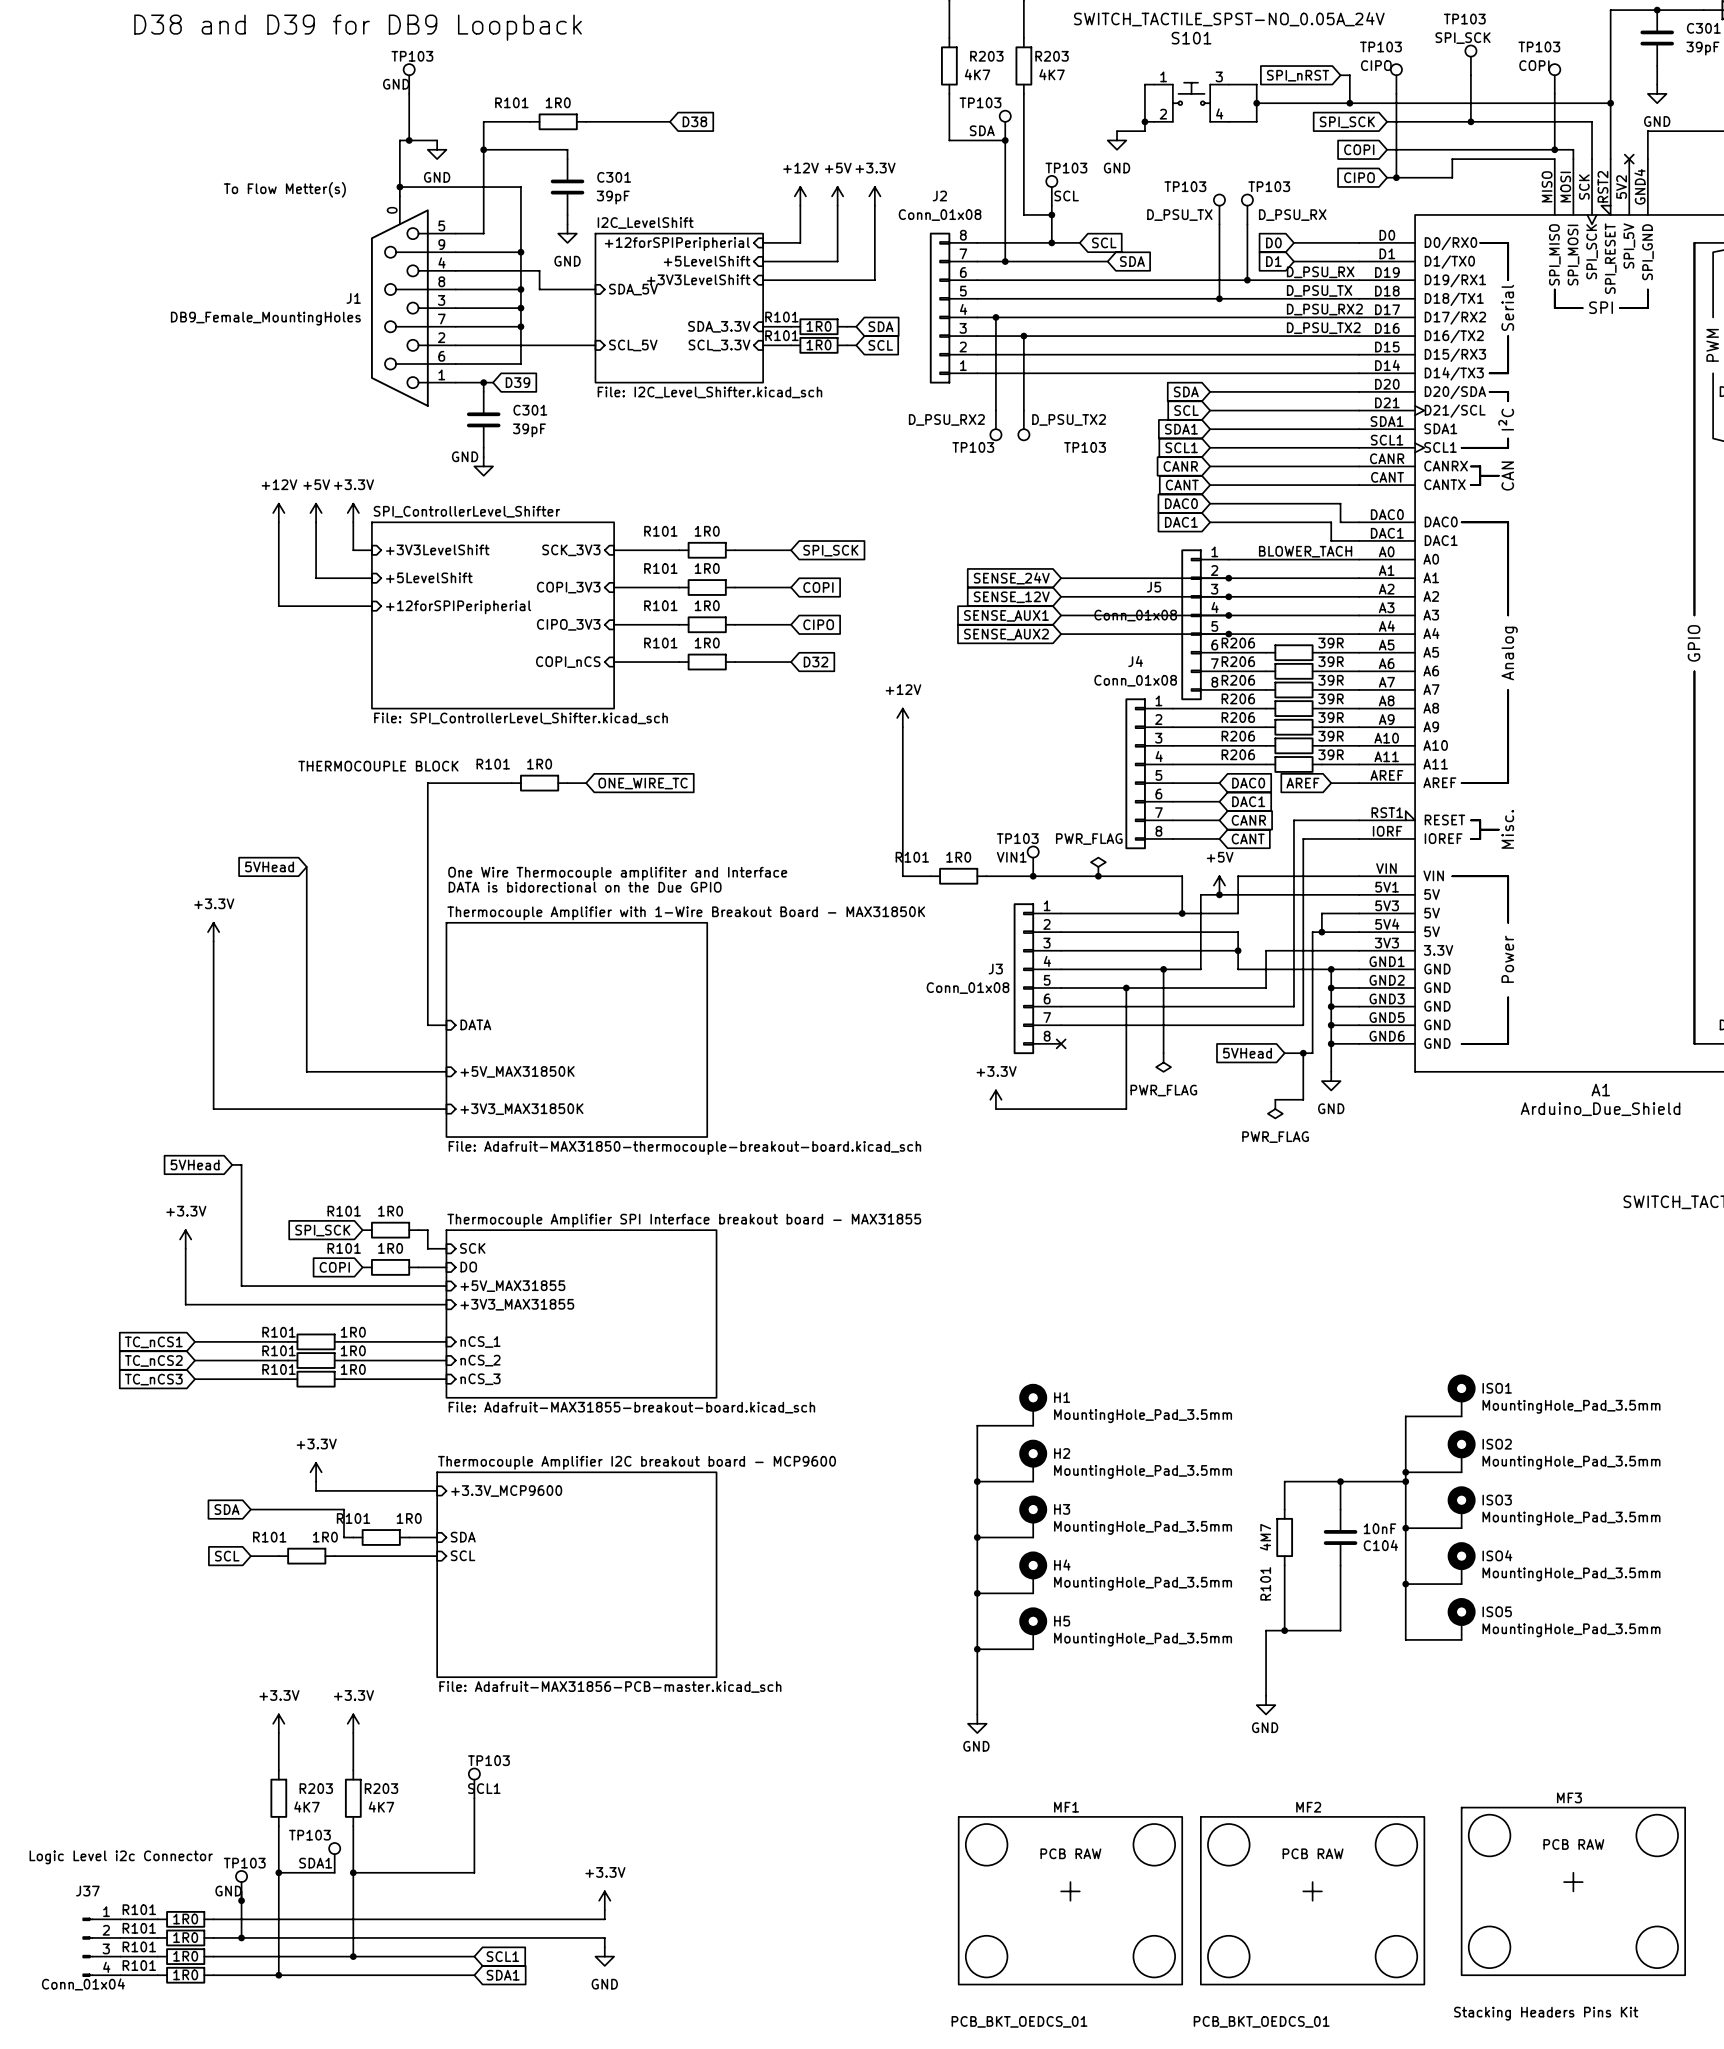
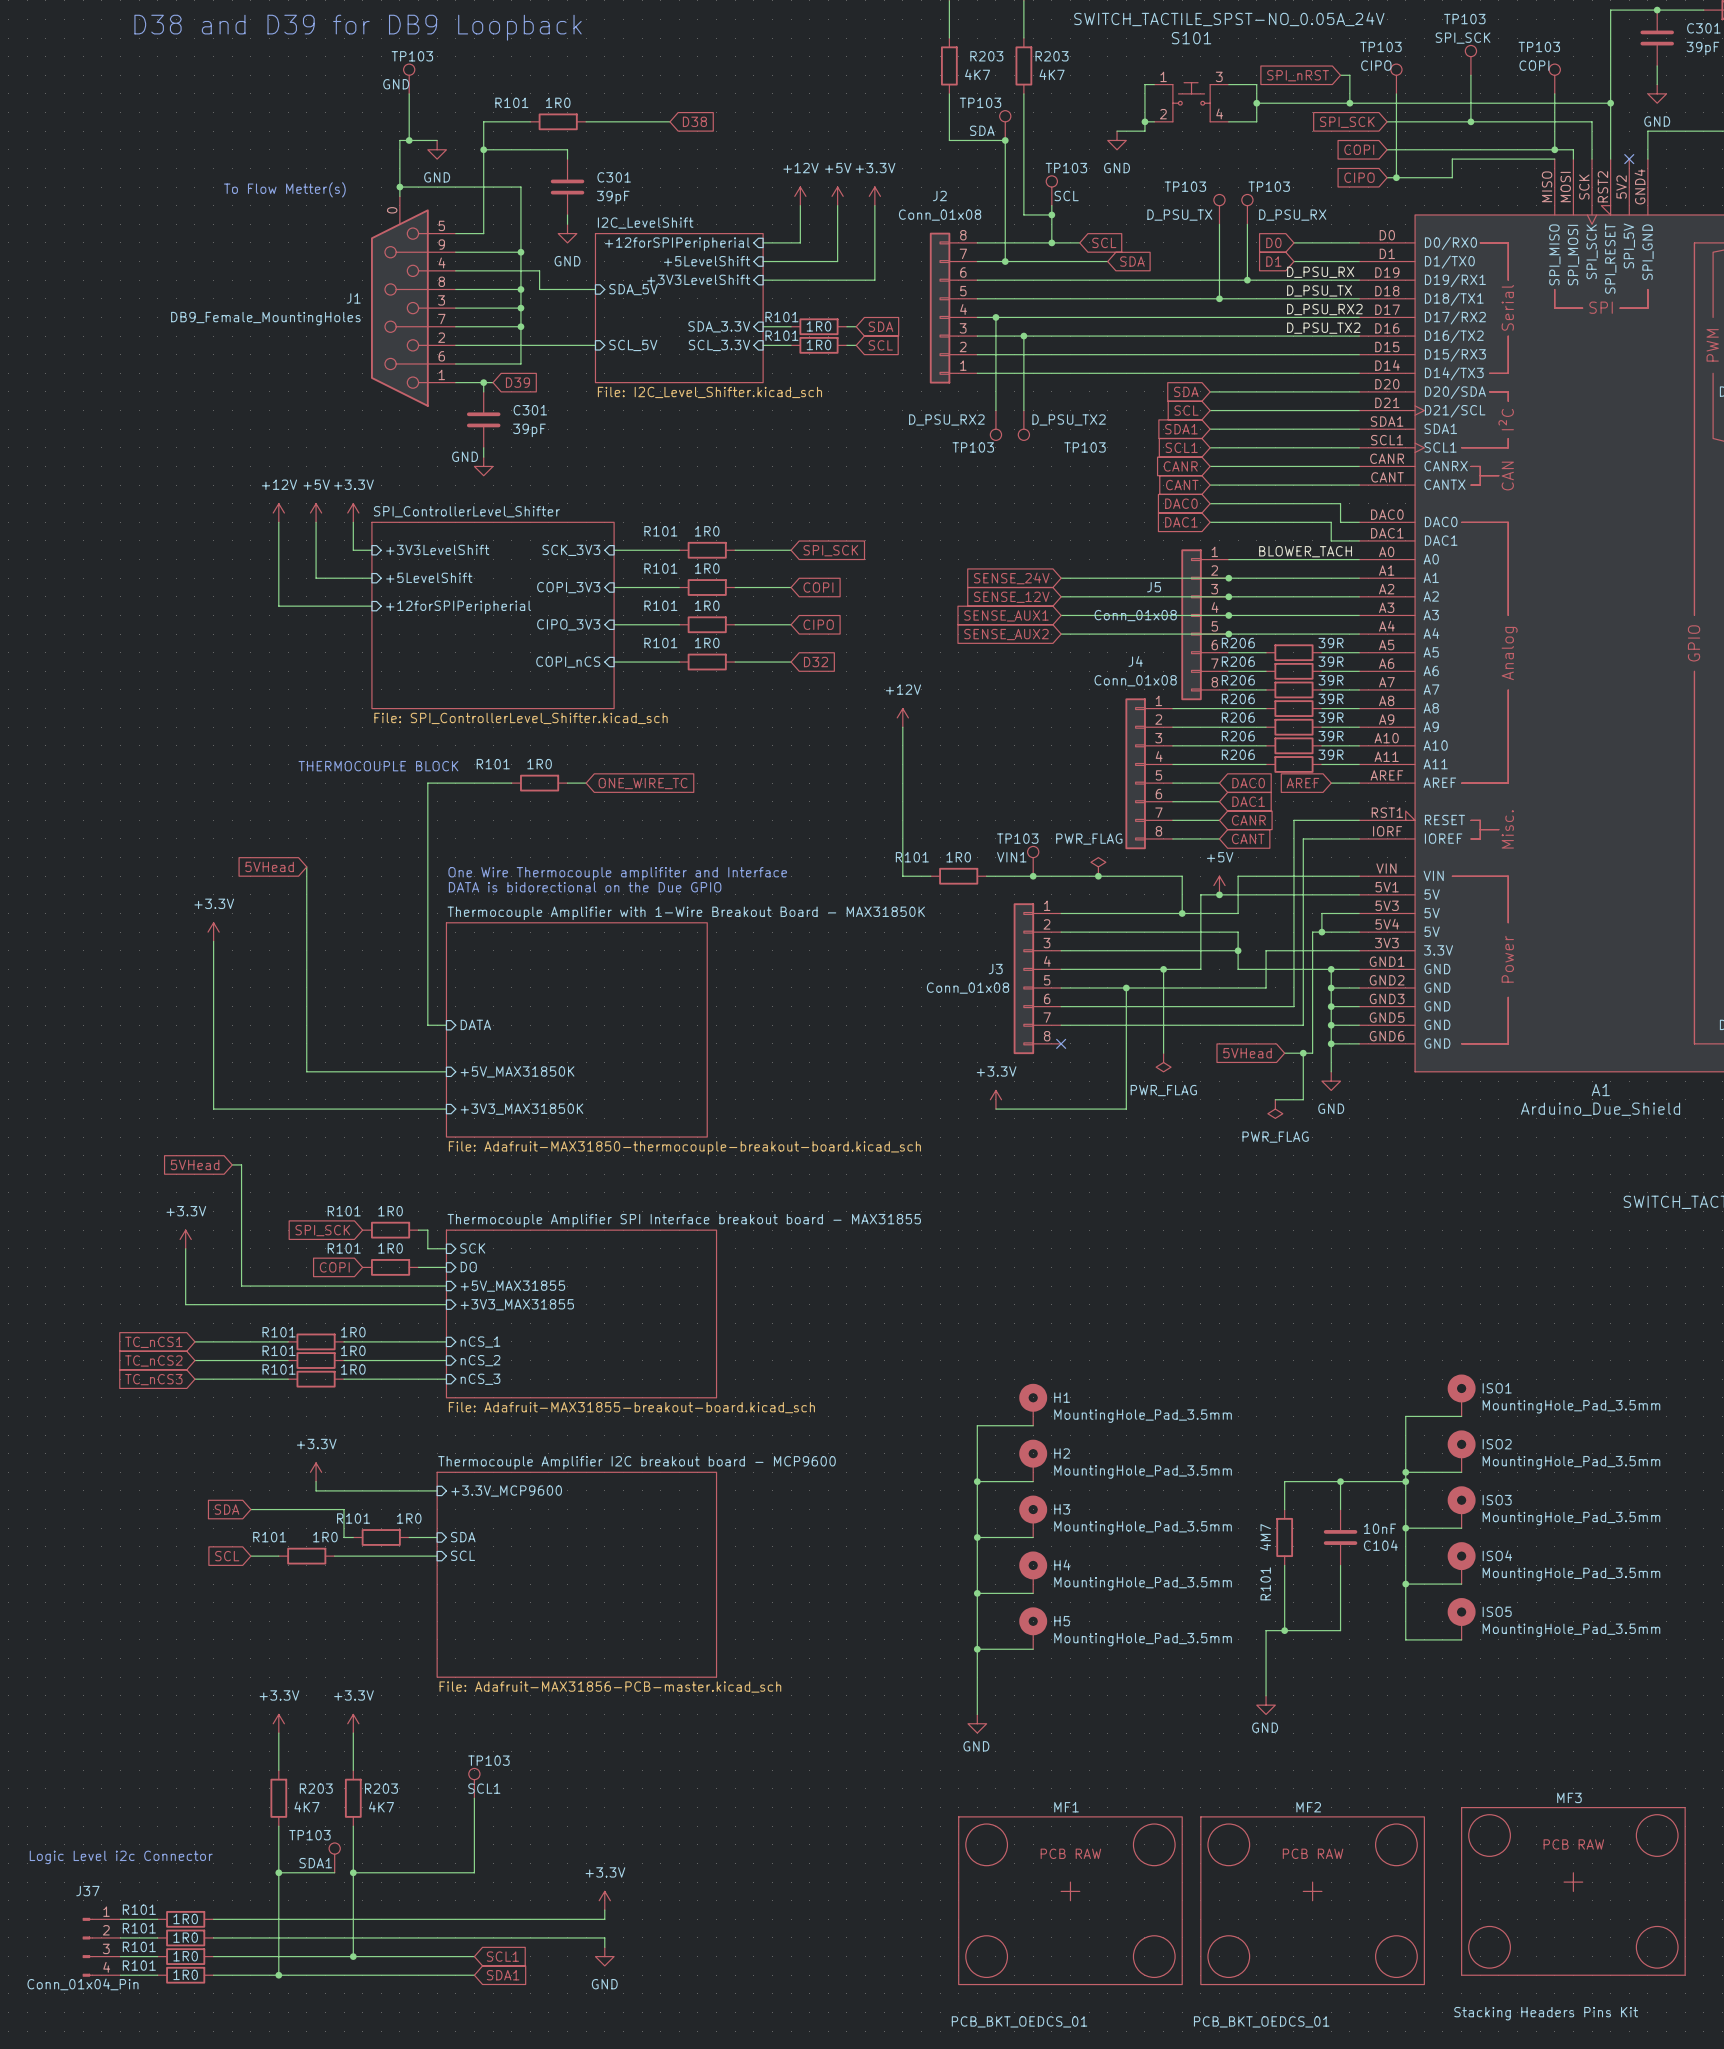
TP103: GND (241, 1885) -> none
wire: (241, 1891) (241, 1937) -> none
junction: (241, 1900) -> none
junction: (241, 1937) -> none
J37 value: Conn_01x04 (83, 1984) -> Conn_01x04_Pin (83, 1984)

